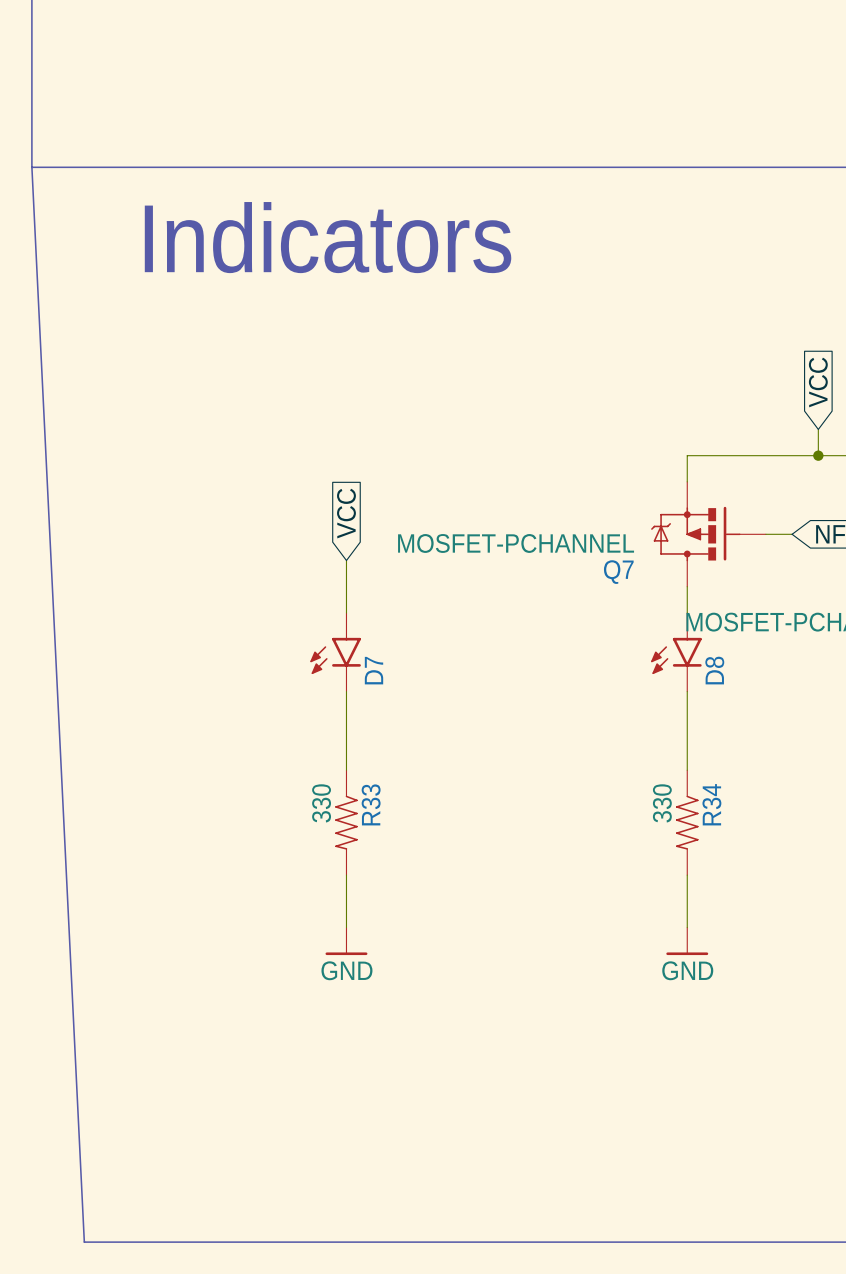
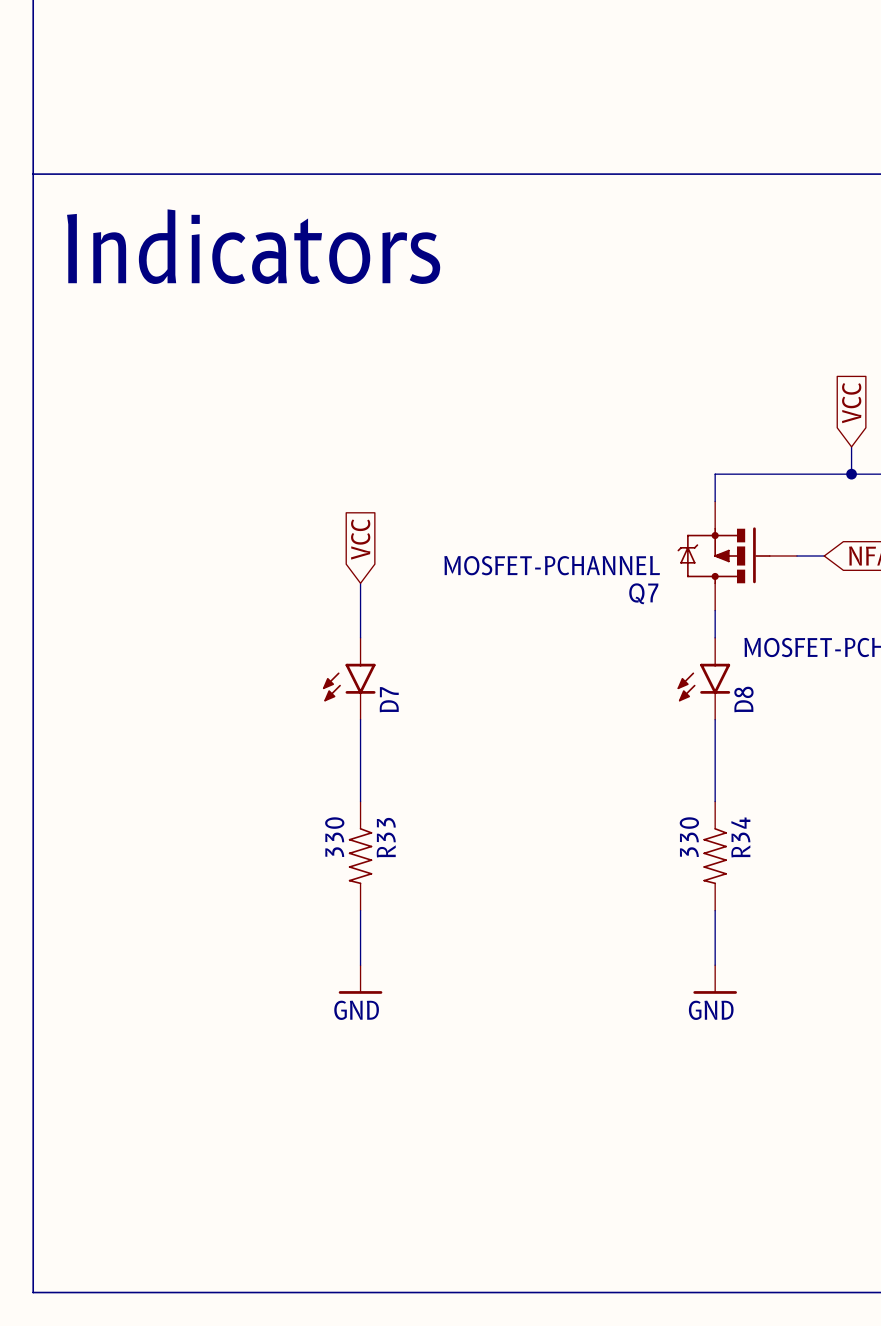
line: (31, 167) (84, 1242) -> (33, 174) (33, 1292) (87, 1292)
text position: Indicators (328, 237) -> Indicators (253, 246)

